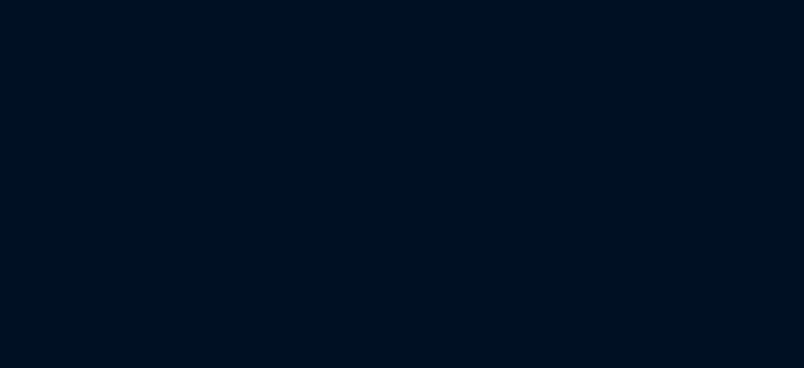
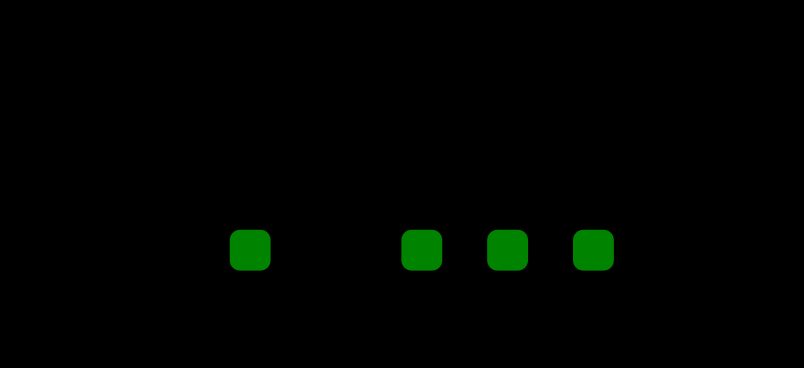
part: none -> (250, 250)
part: none -> (421, 250)
part: none -> (507, 250)
part: none -> (593, 250)

